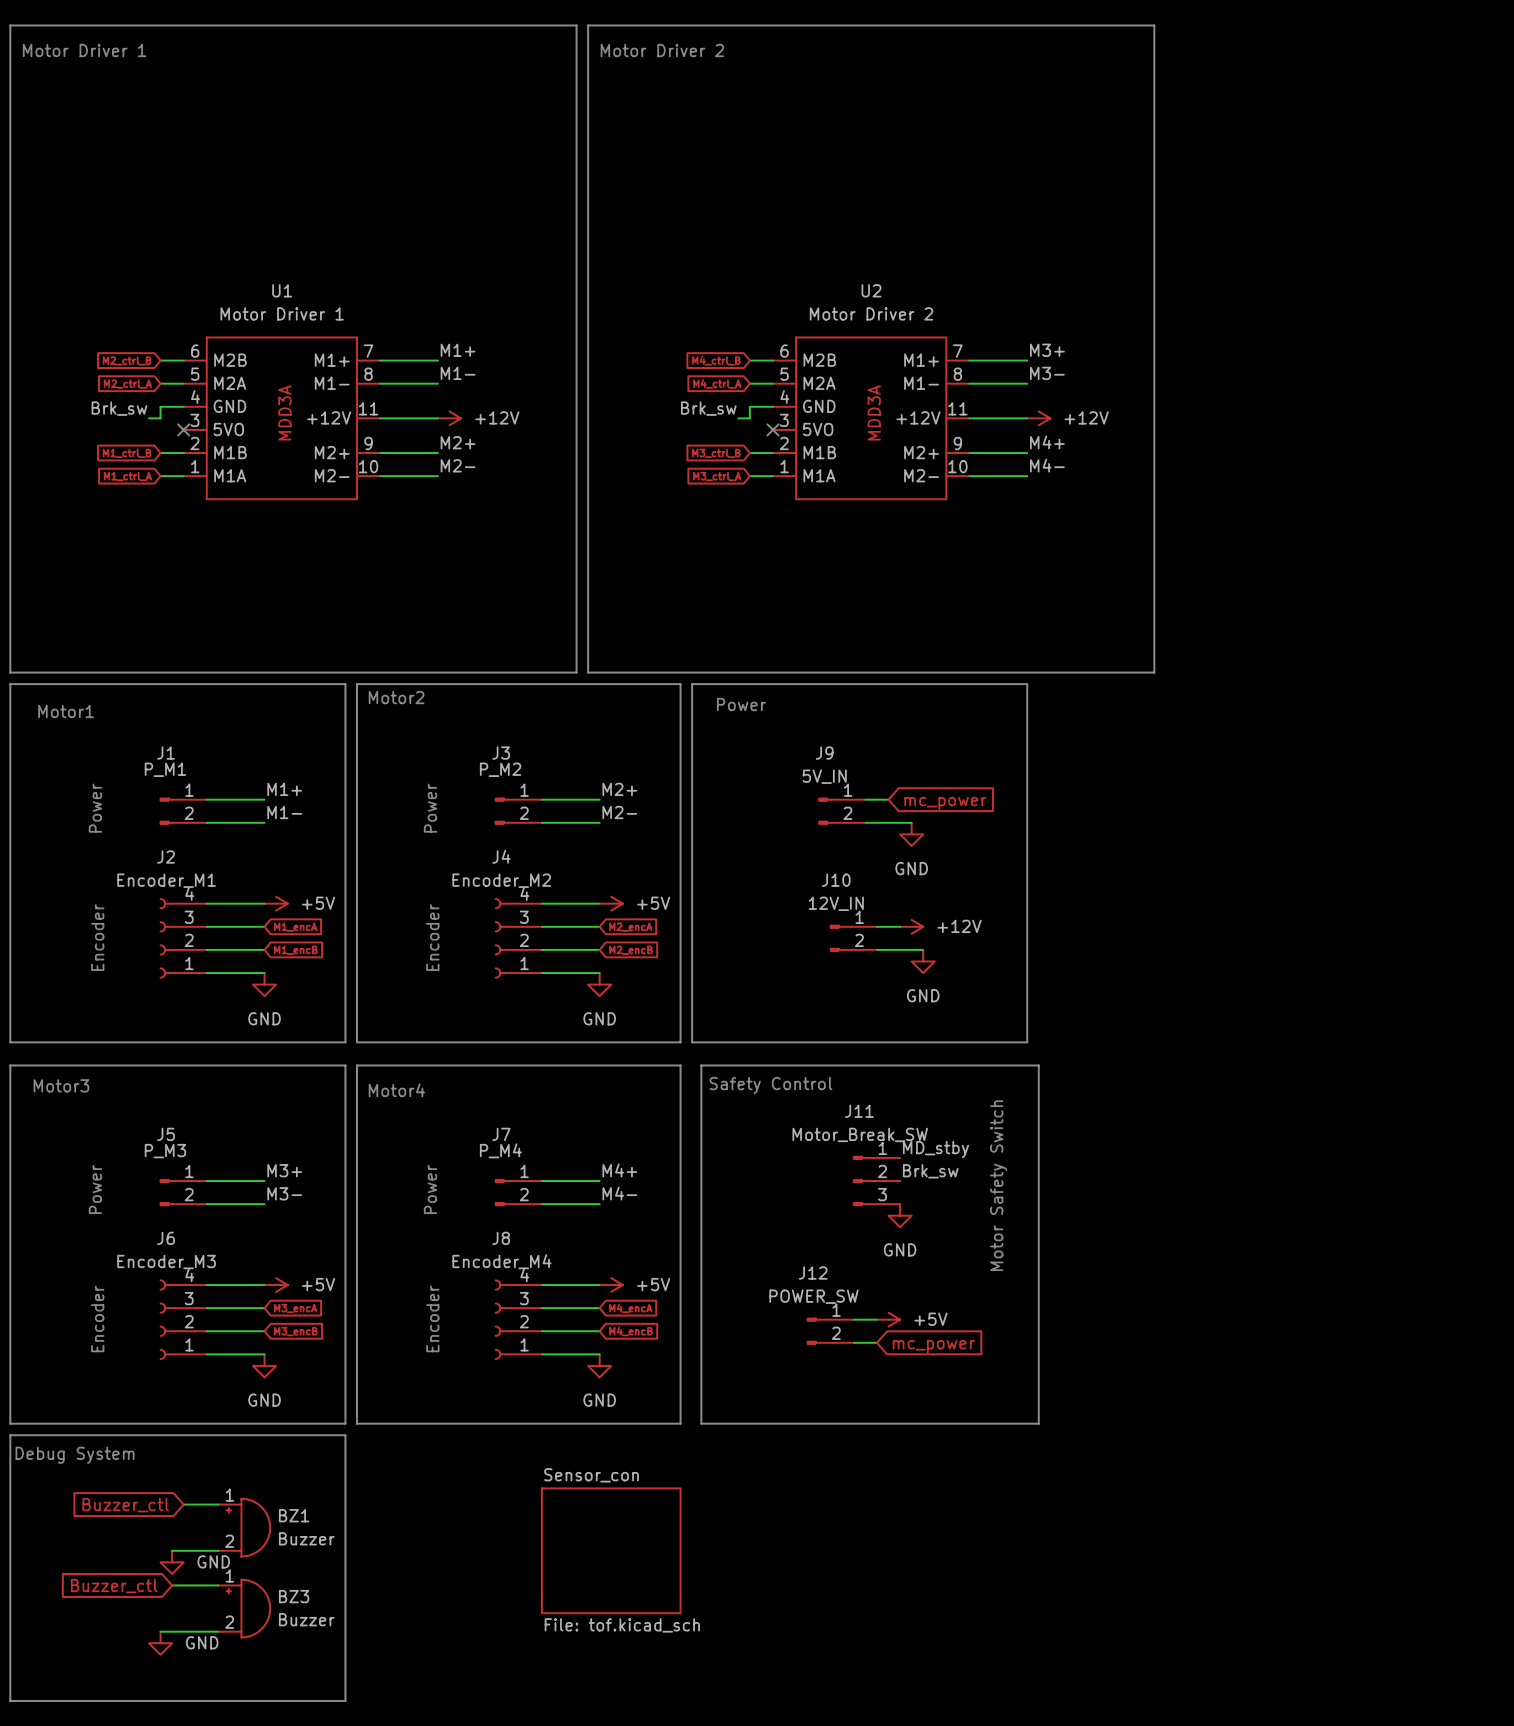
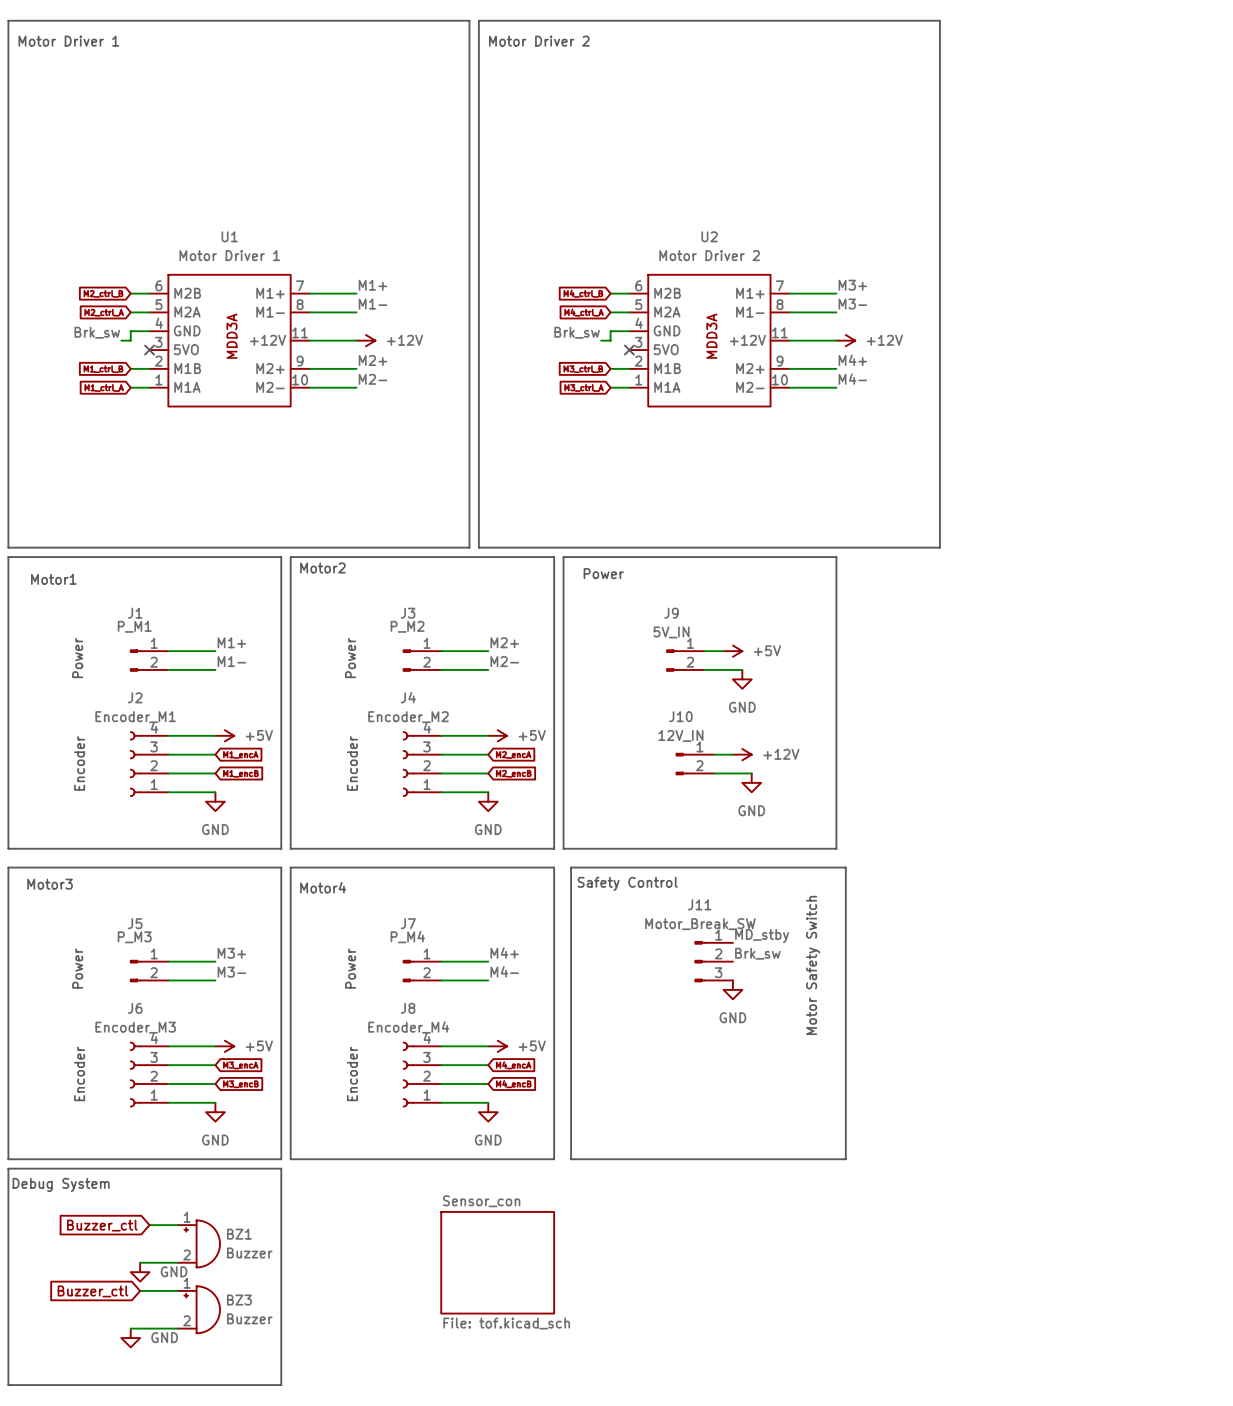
power symbol: none -> +5V (732, 651)
global label: mc_power (945, 803) -> none
wire: (853, 1319) (876, 1319) -> none
power symbol: +5V (888, 1319) -> none
J12: POWER_SW (830, 1331) -> none
wire: (853, 1342) (876, 1342) -> none
global label: mc_power (933, 1346) -> none

